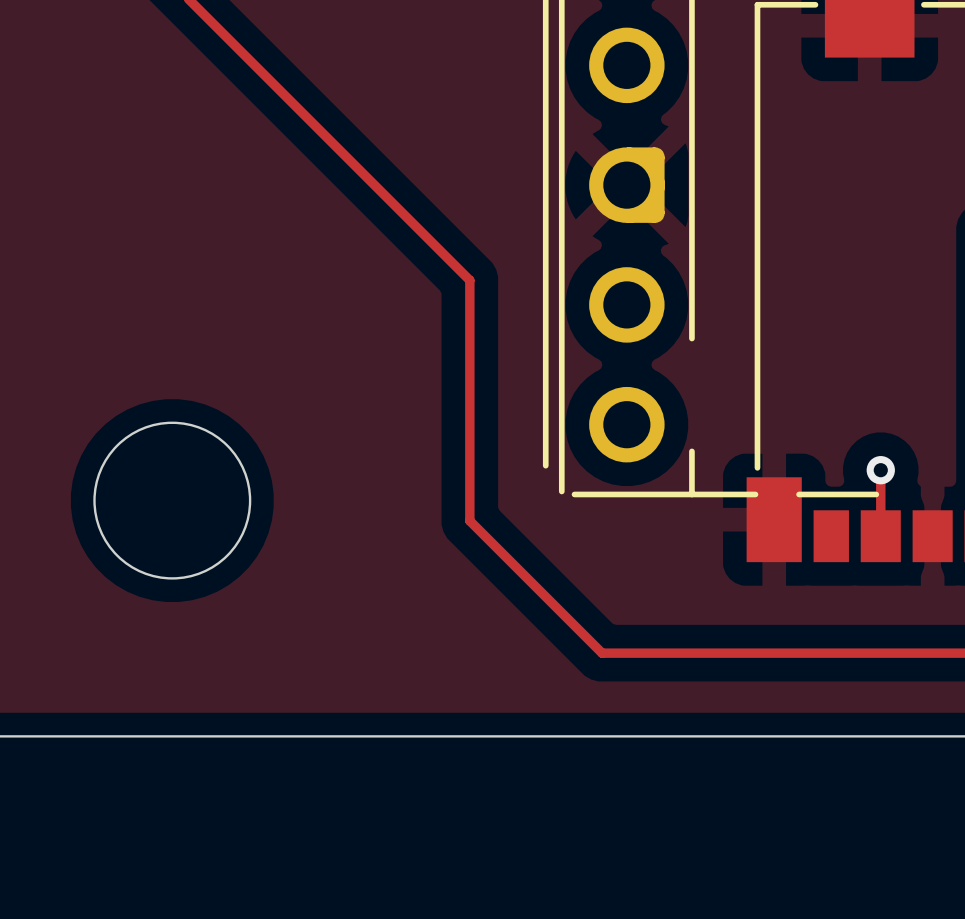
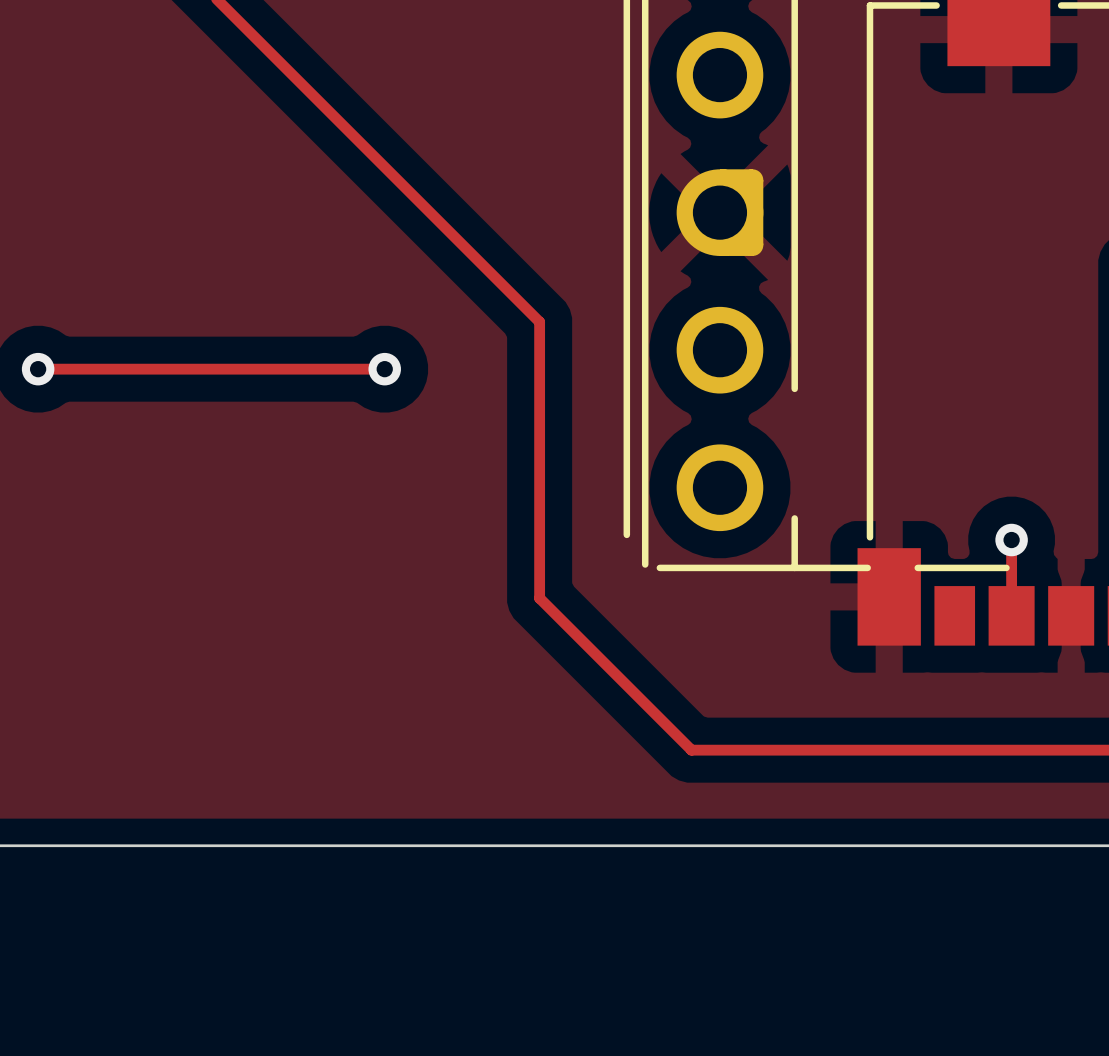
track: none -> (38, 369) (384, 369)
via: none -> (38, 369)
via: none -> (384, 369)
round board edge: [93, 421, 252, 580] -> none

